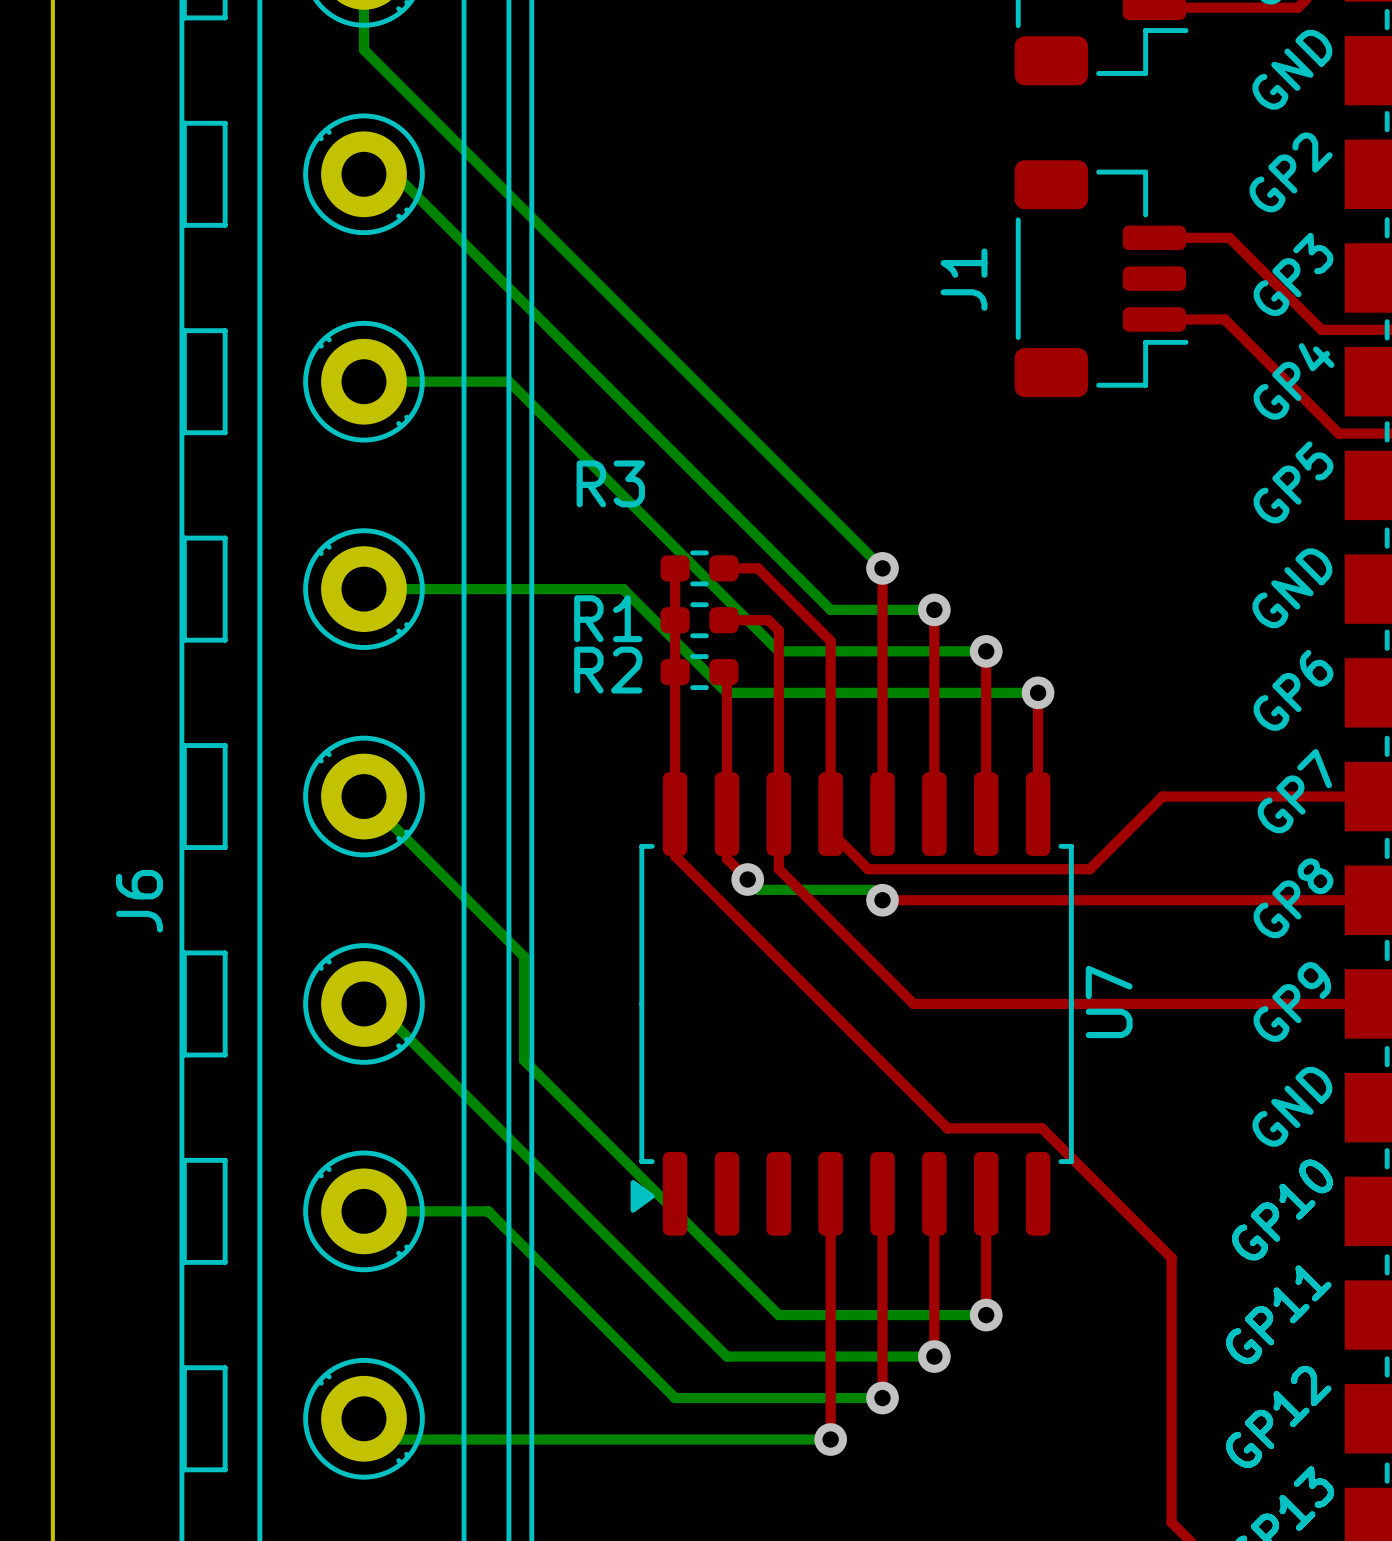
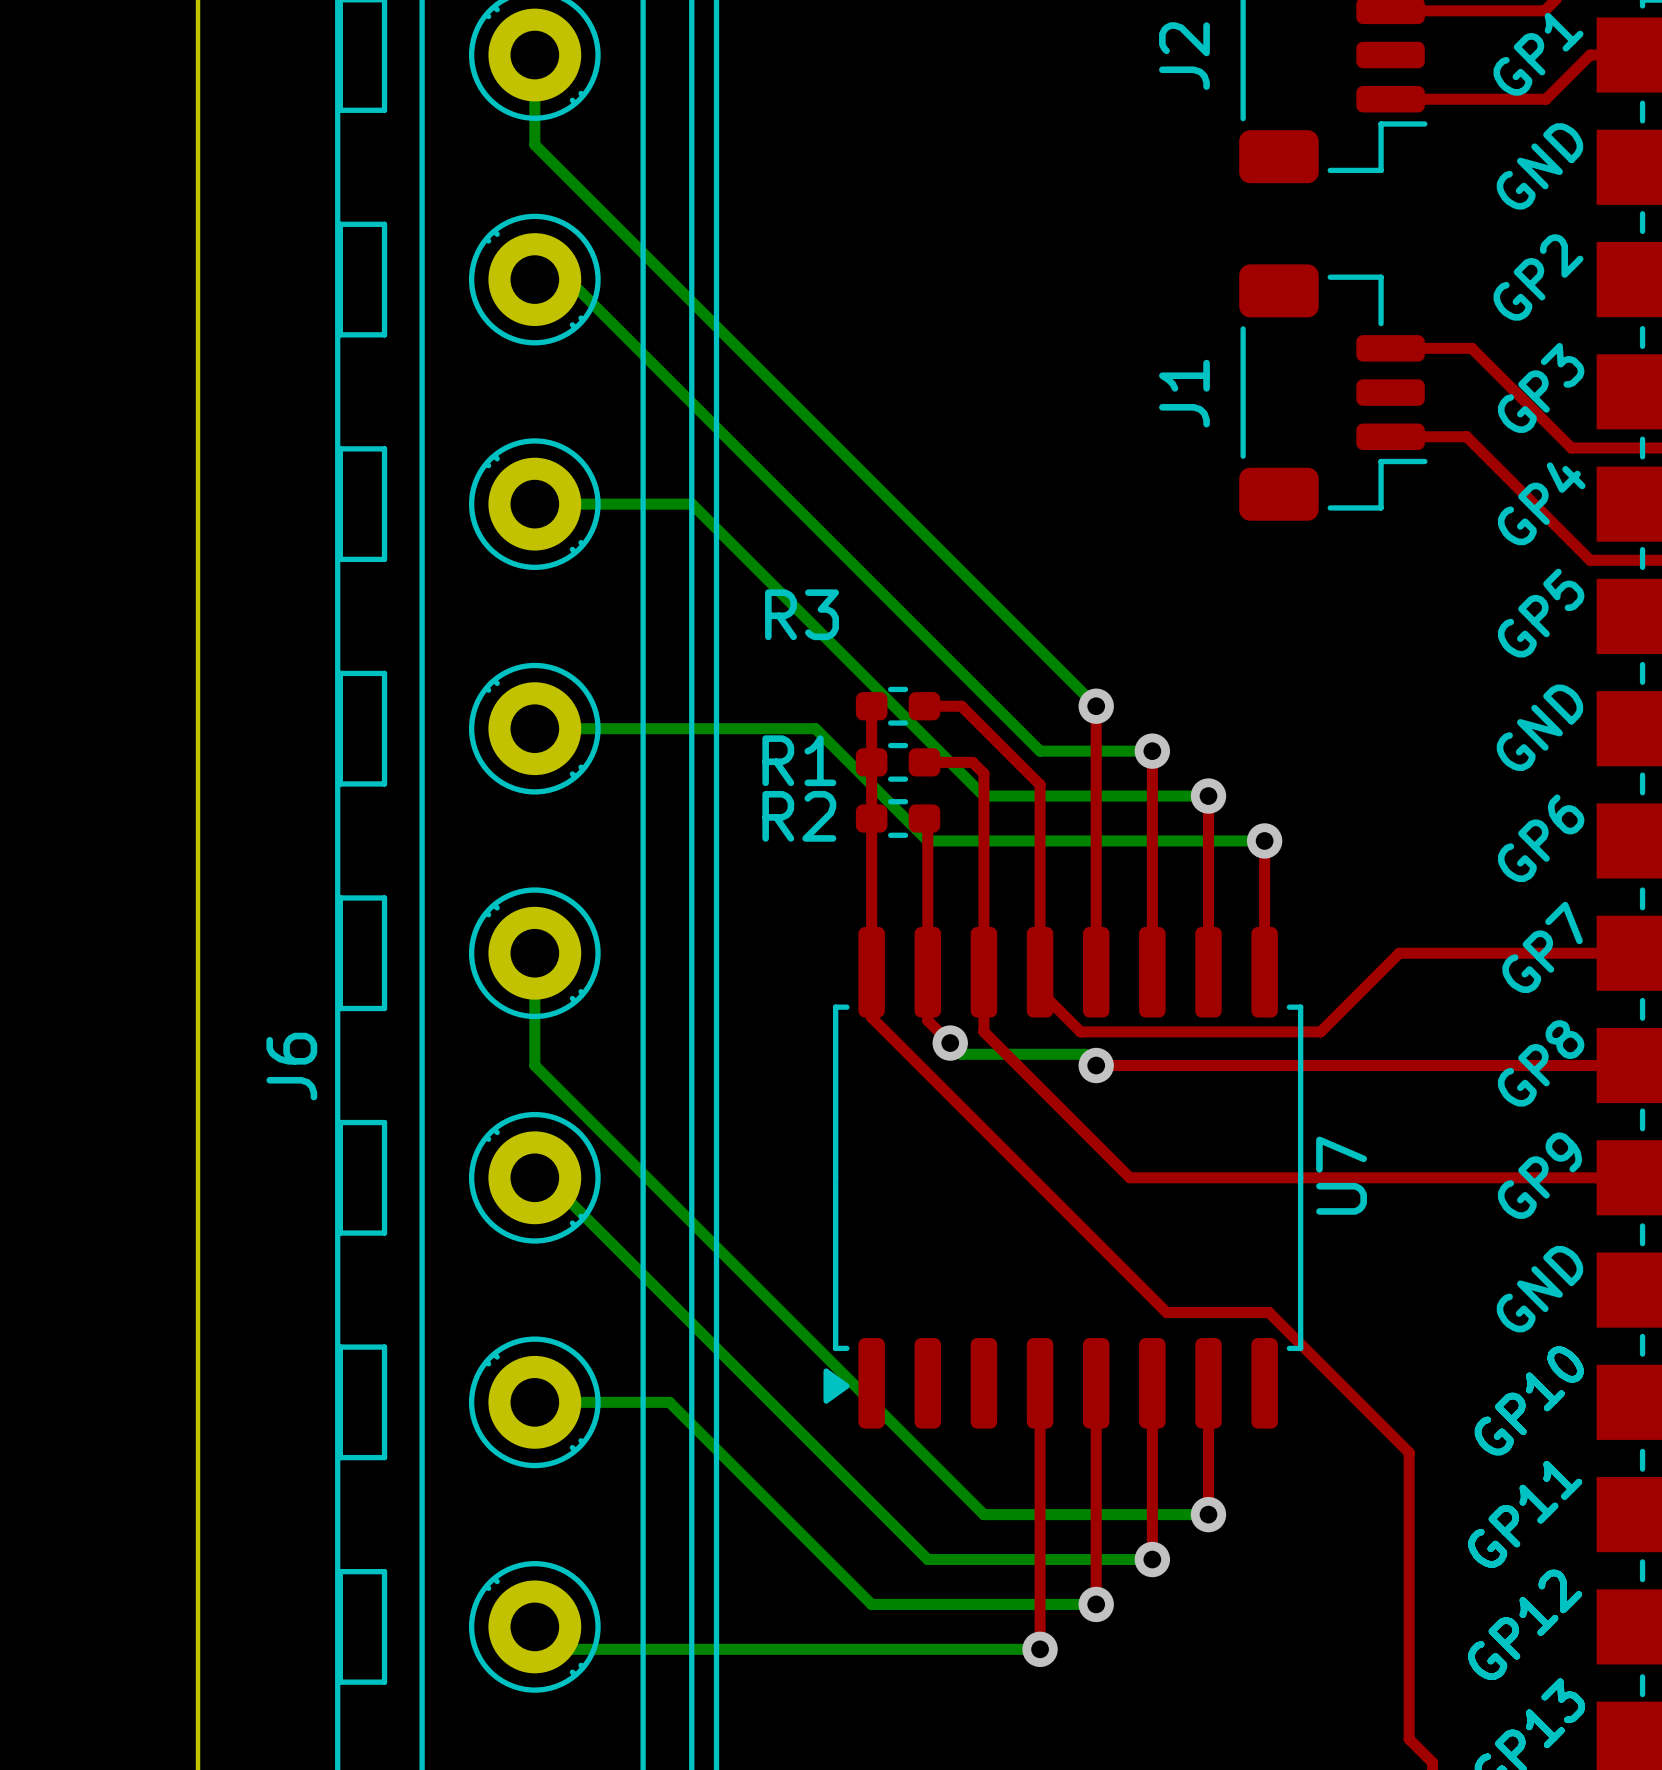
bottom track: (363, 796) (524, 956) (524, 1060) -> (534, 953) (534, 1065) (708, 1238)

